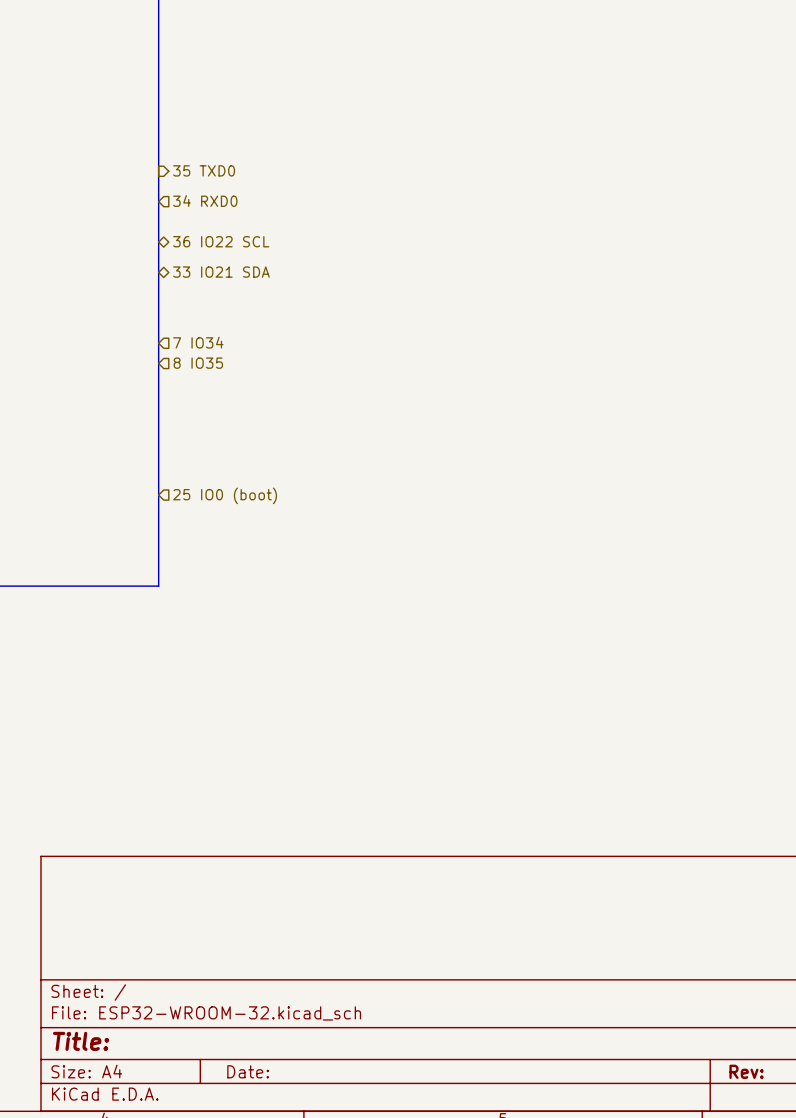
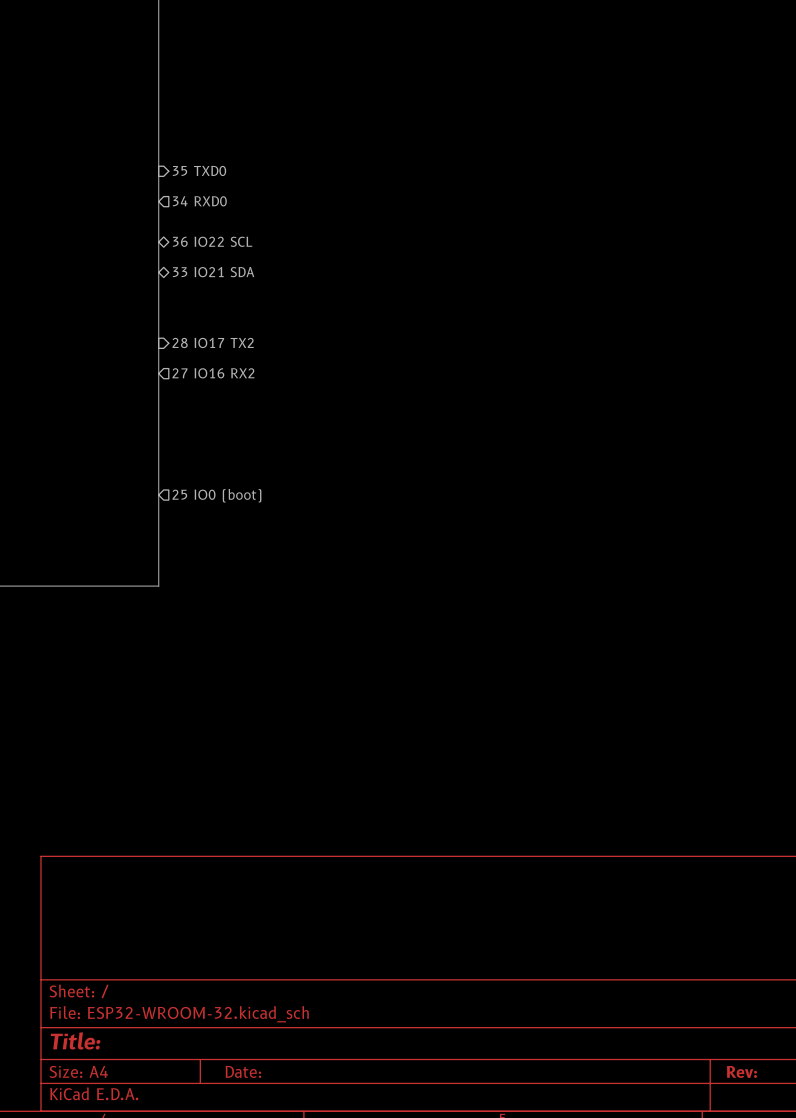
hierarchical label shape: input (198, 342) -> output (213, 342)
hierarchical label: 7 IO34 (198, 342) -> 28 IO17 TX2 (213, 342)
hierarchical label: 8 IO35 (198, 363) -> none
hierarchical label: none -> 27 IO16 RX2 (213, 373)

